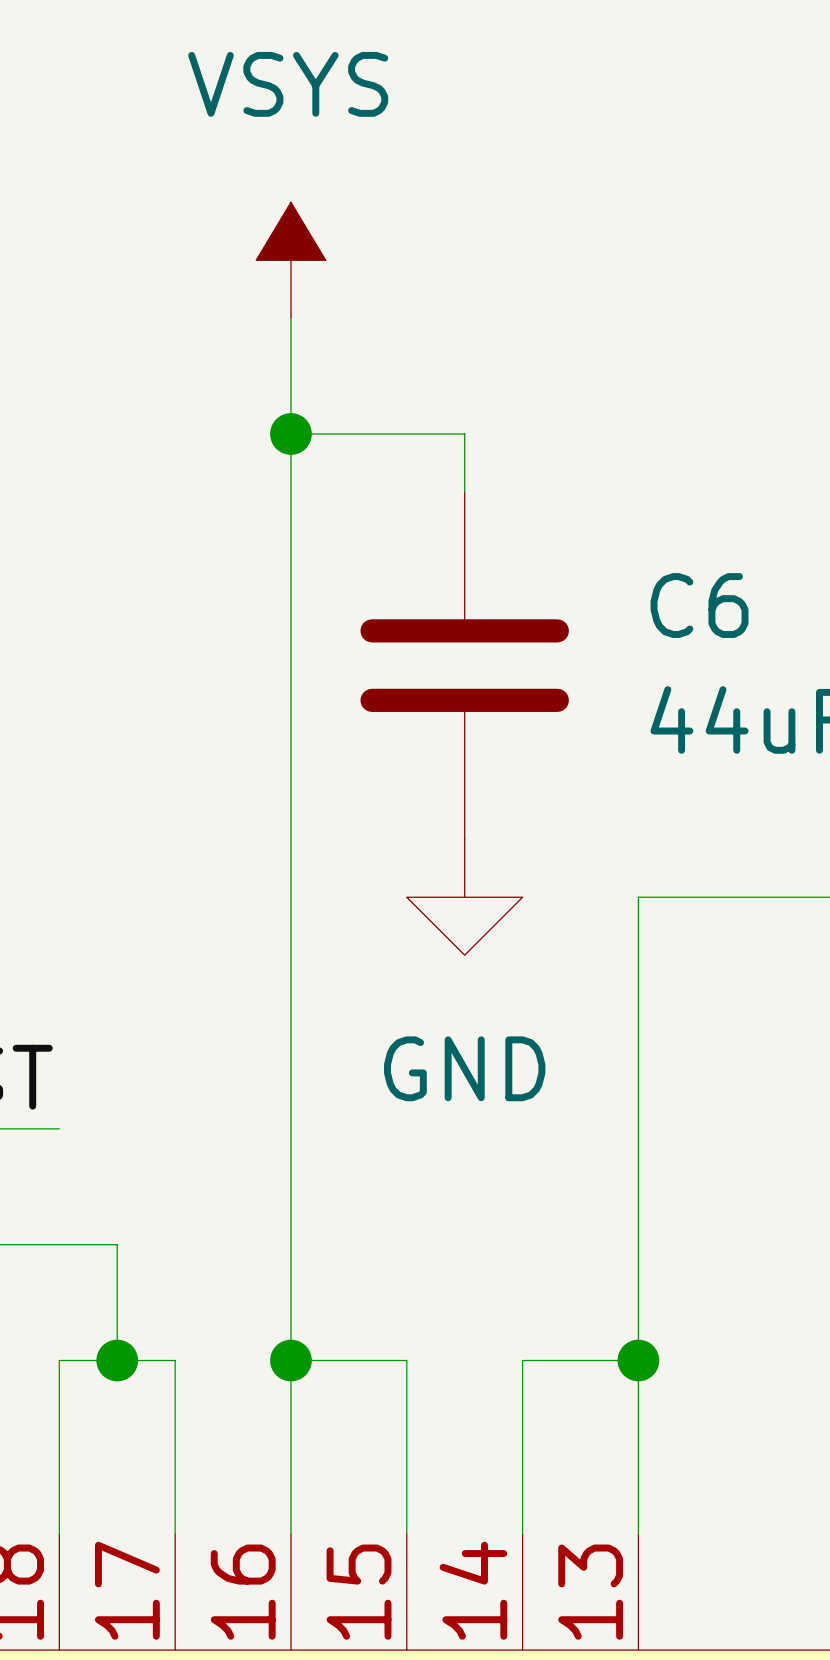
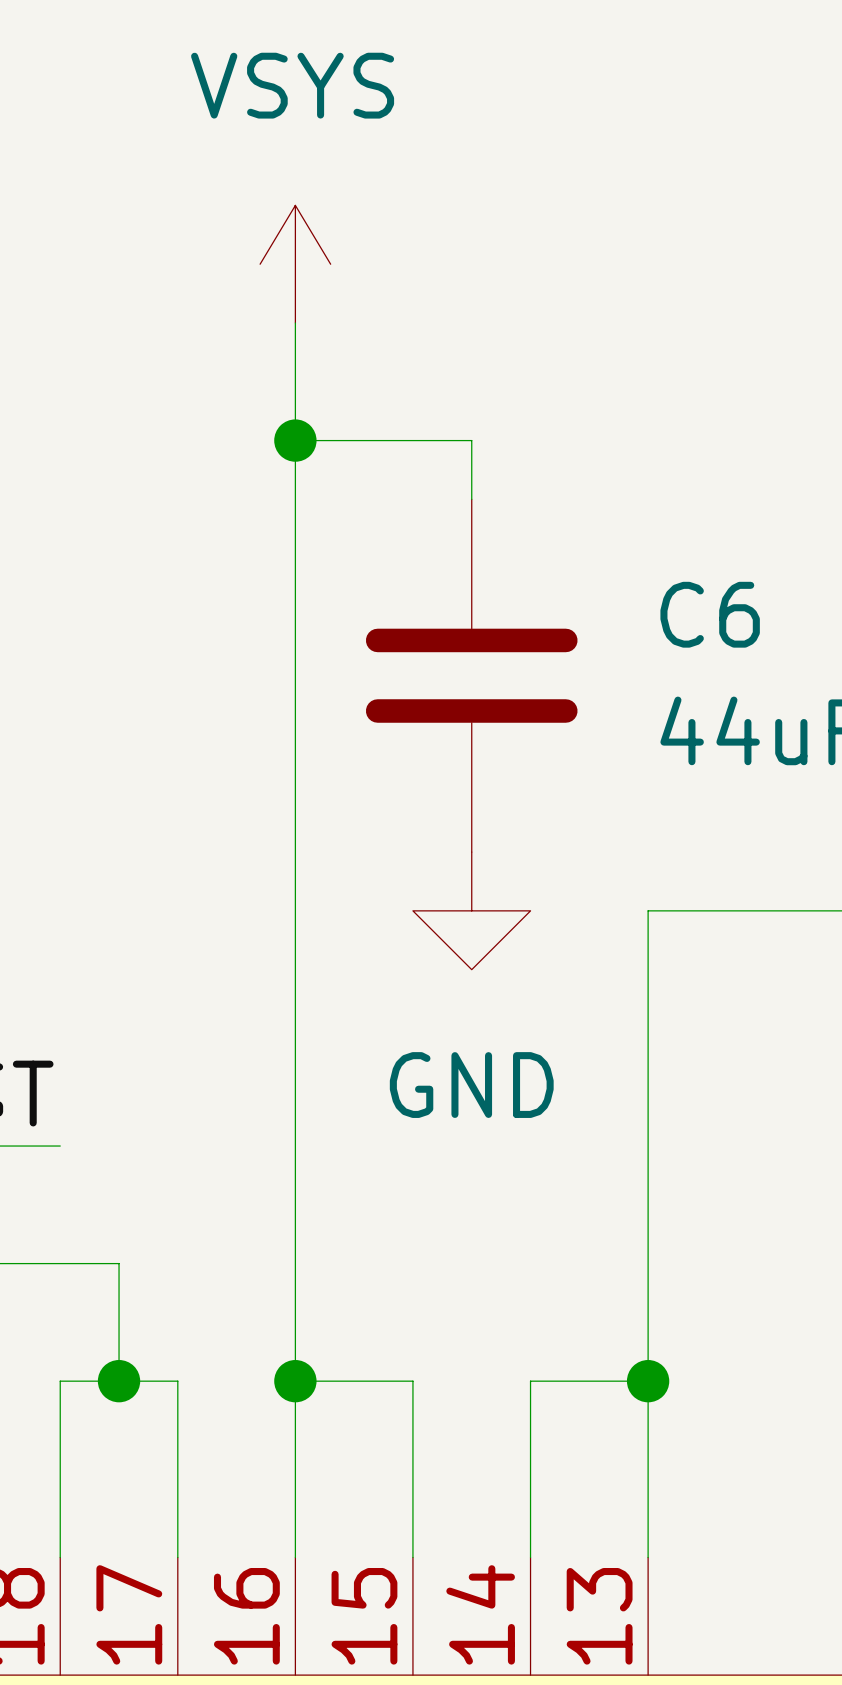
power symbol shape: [256, 202, 326, 319] -> [260, 205, 331, 324]

